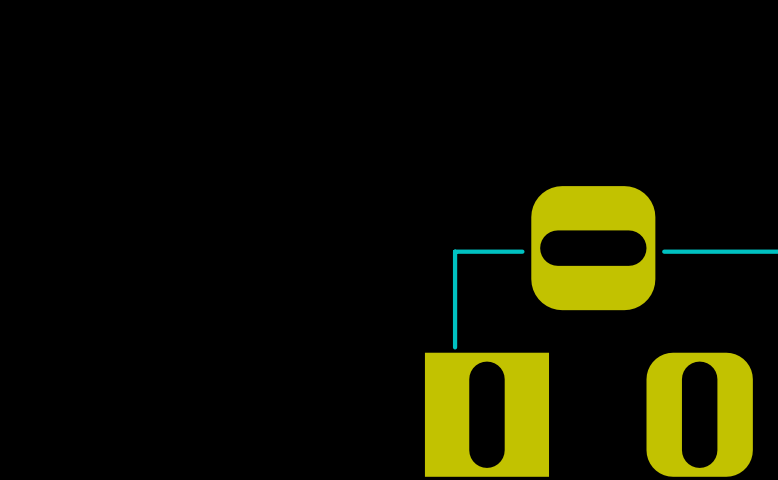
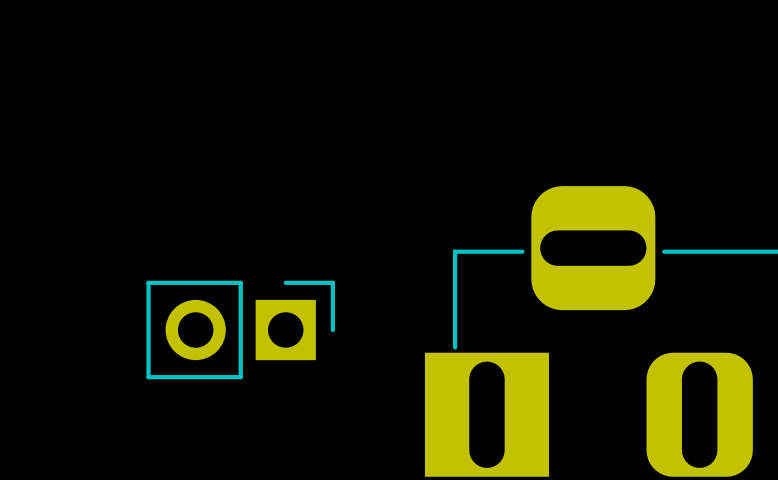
part: none -> (240, 330)

